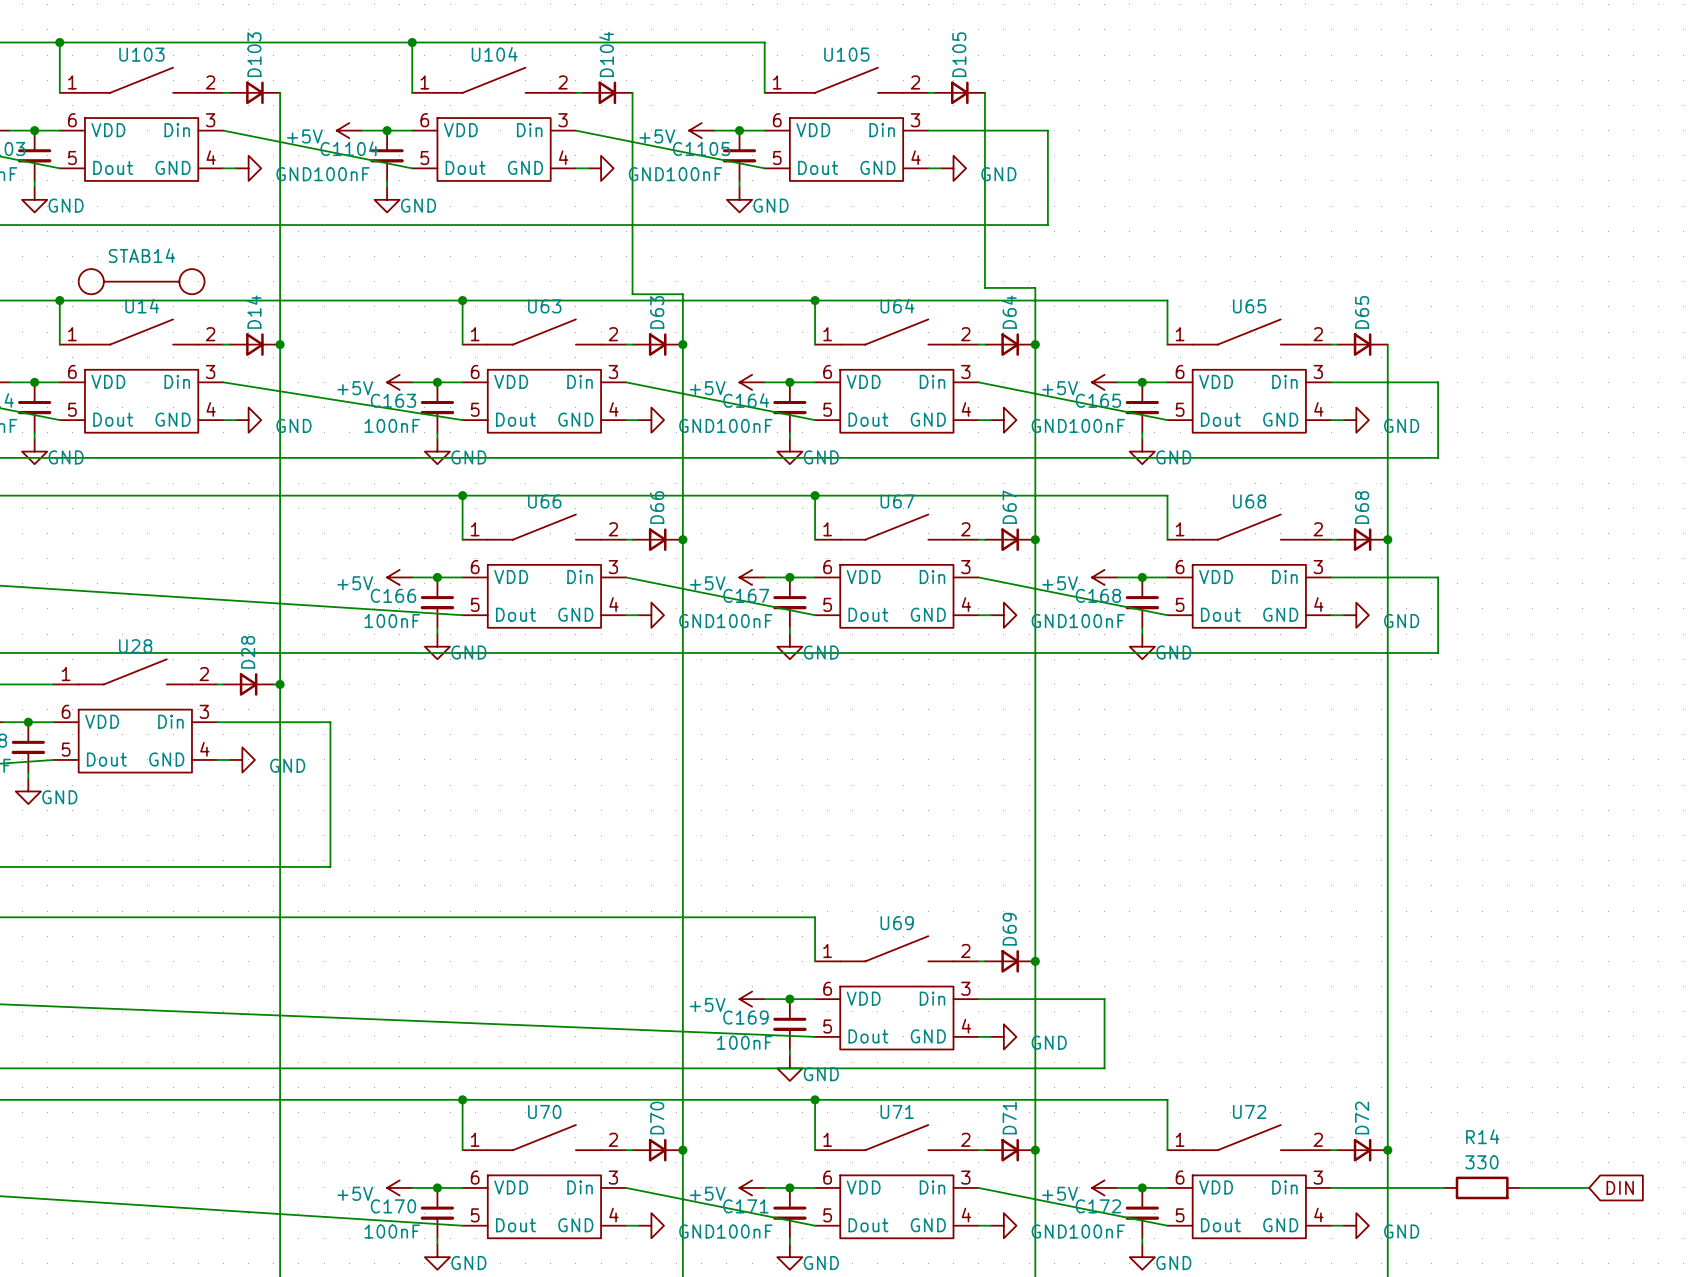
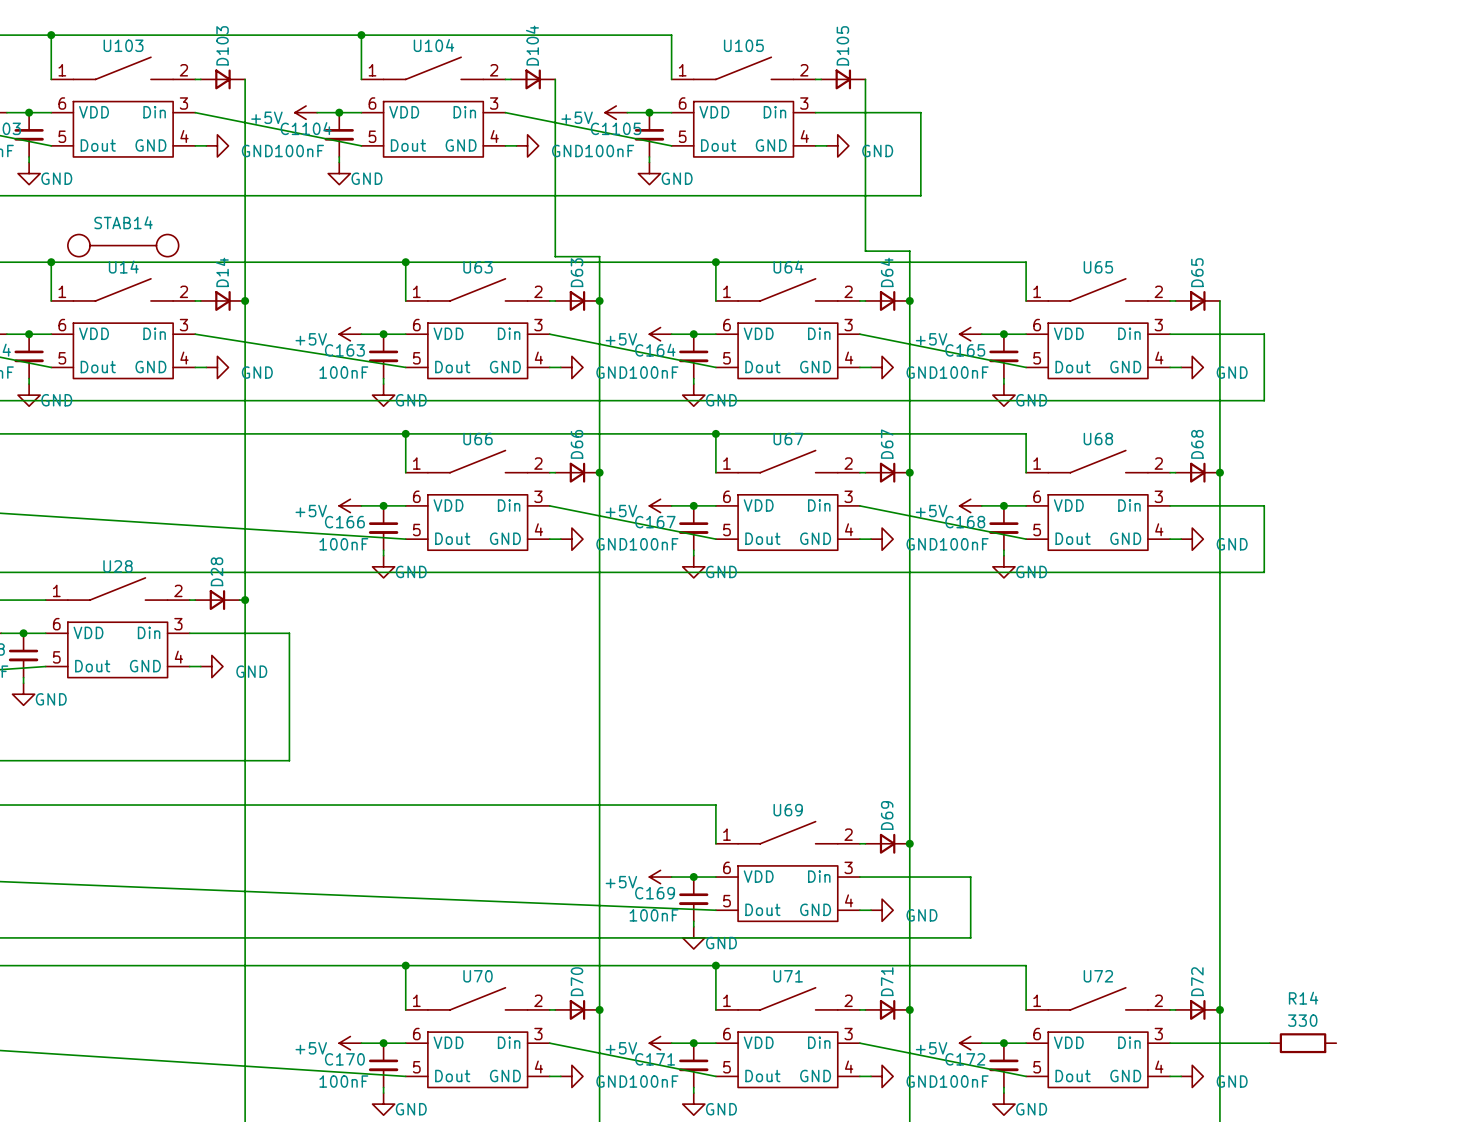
wire: (1519, 1187) (1589, 1187) -> none
global label: DIN (1620, 1187) -> none

